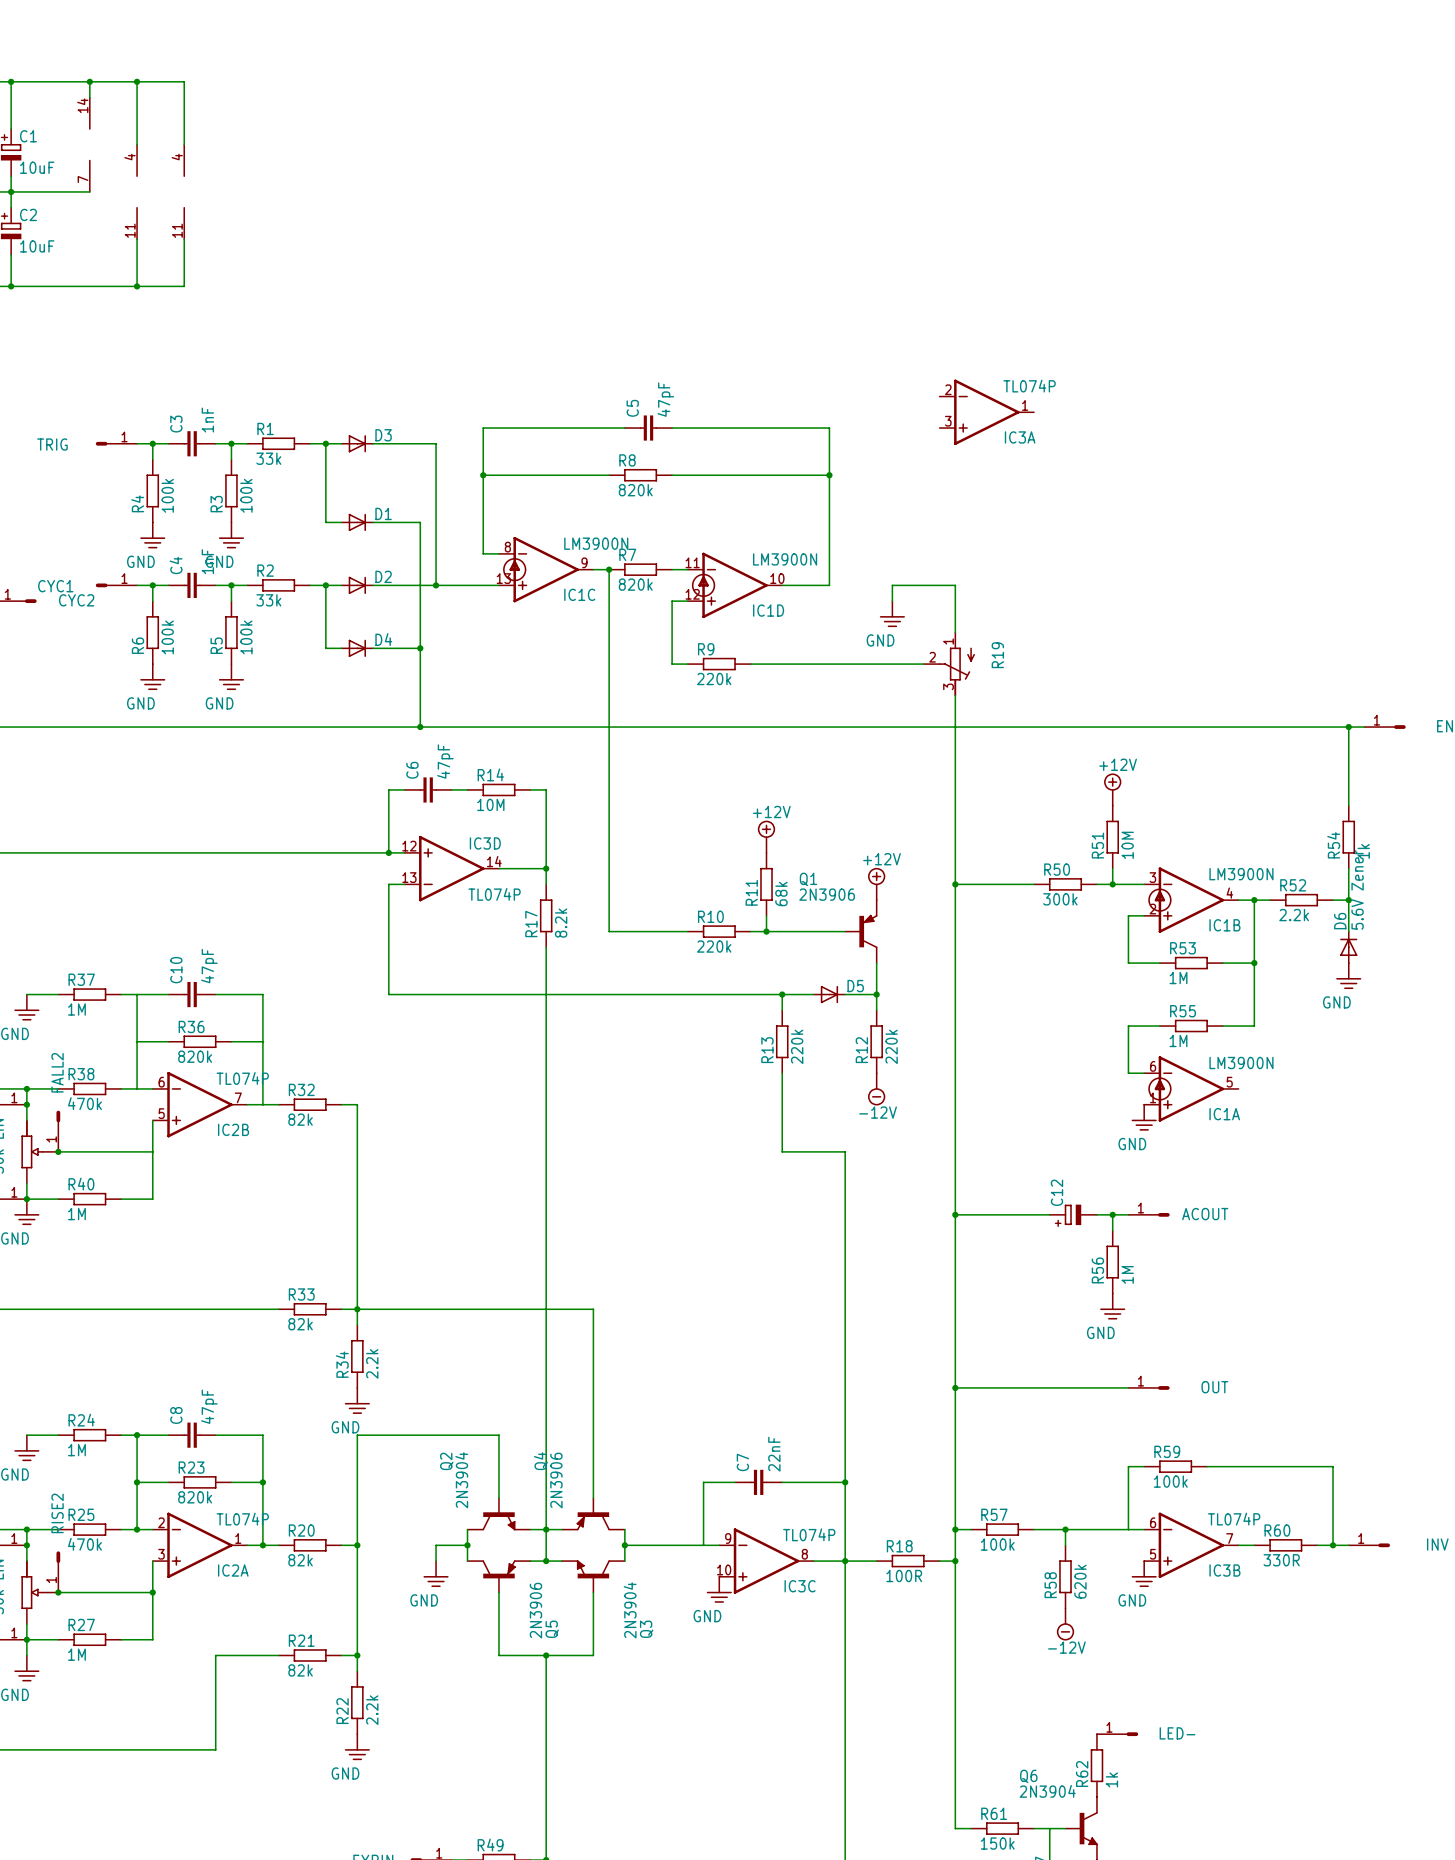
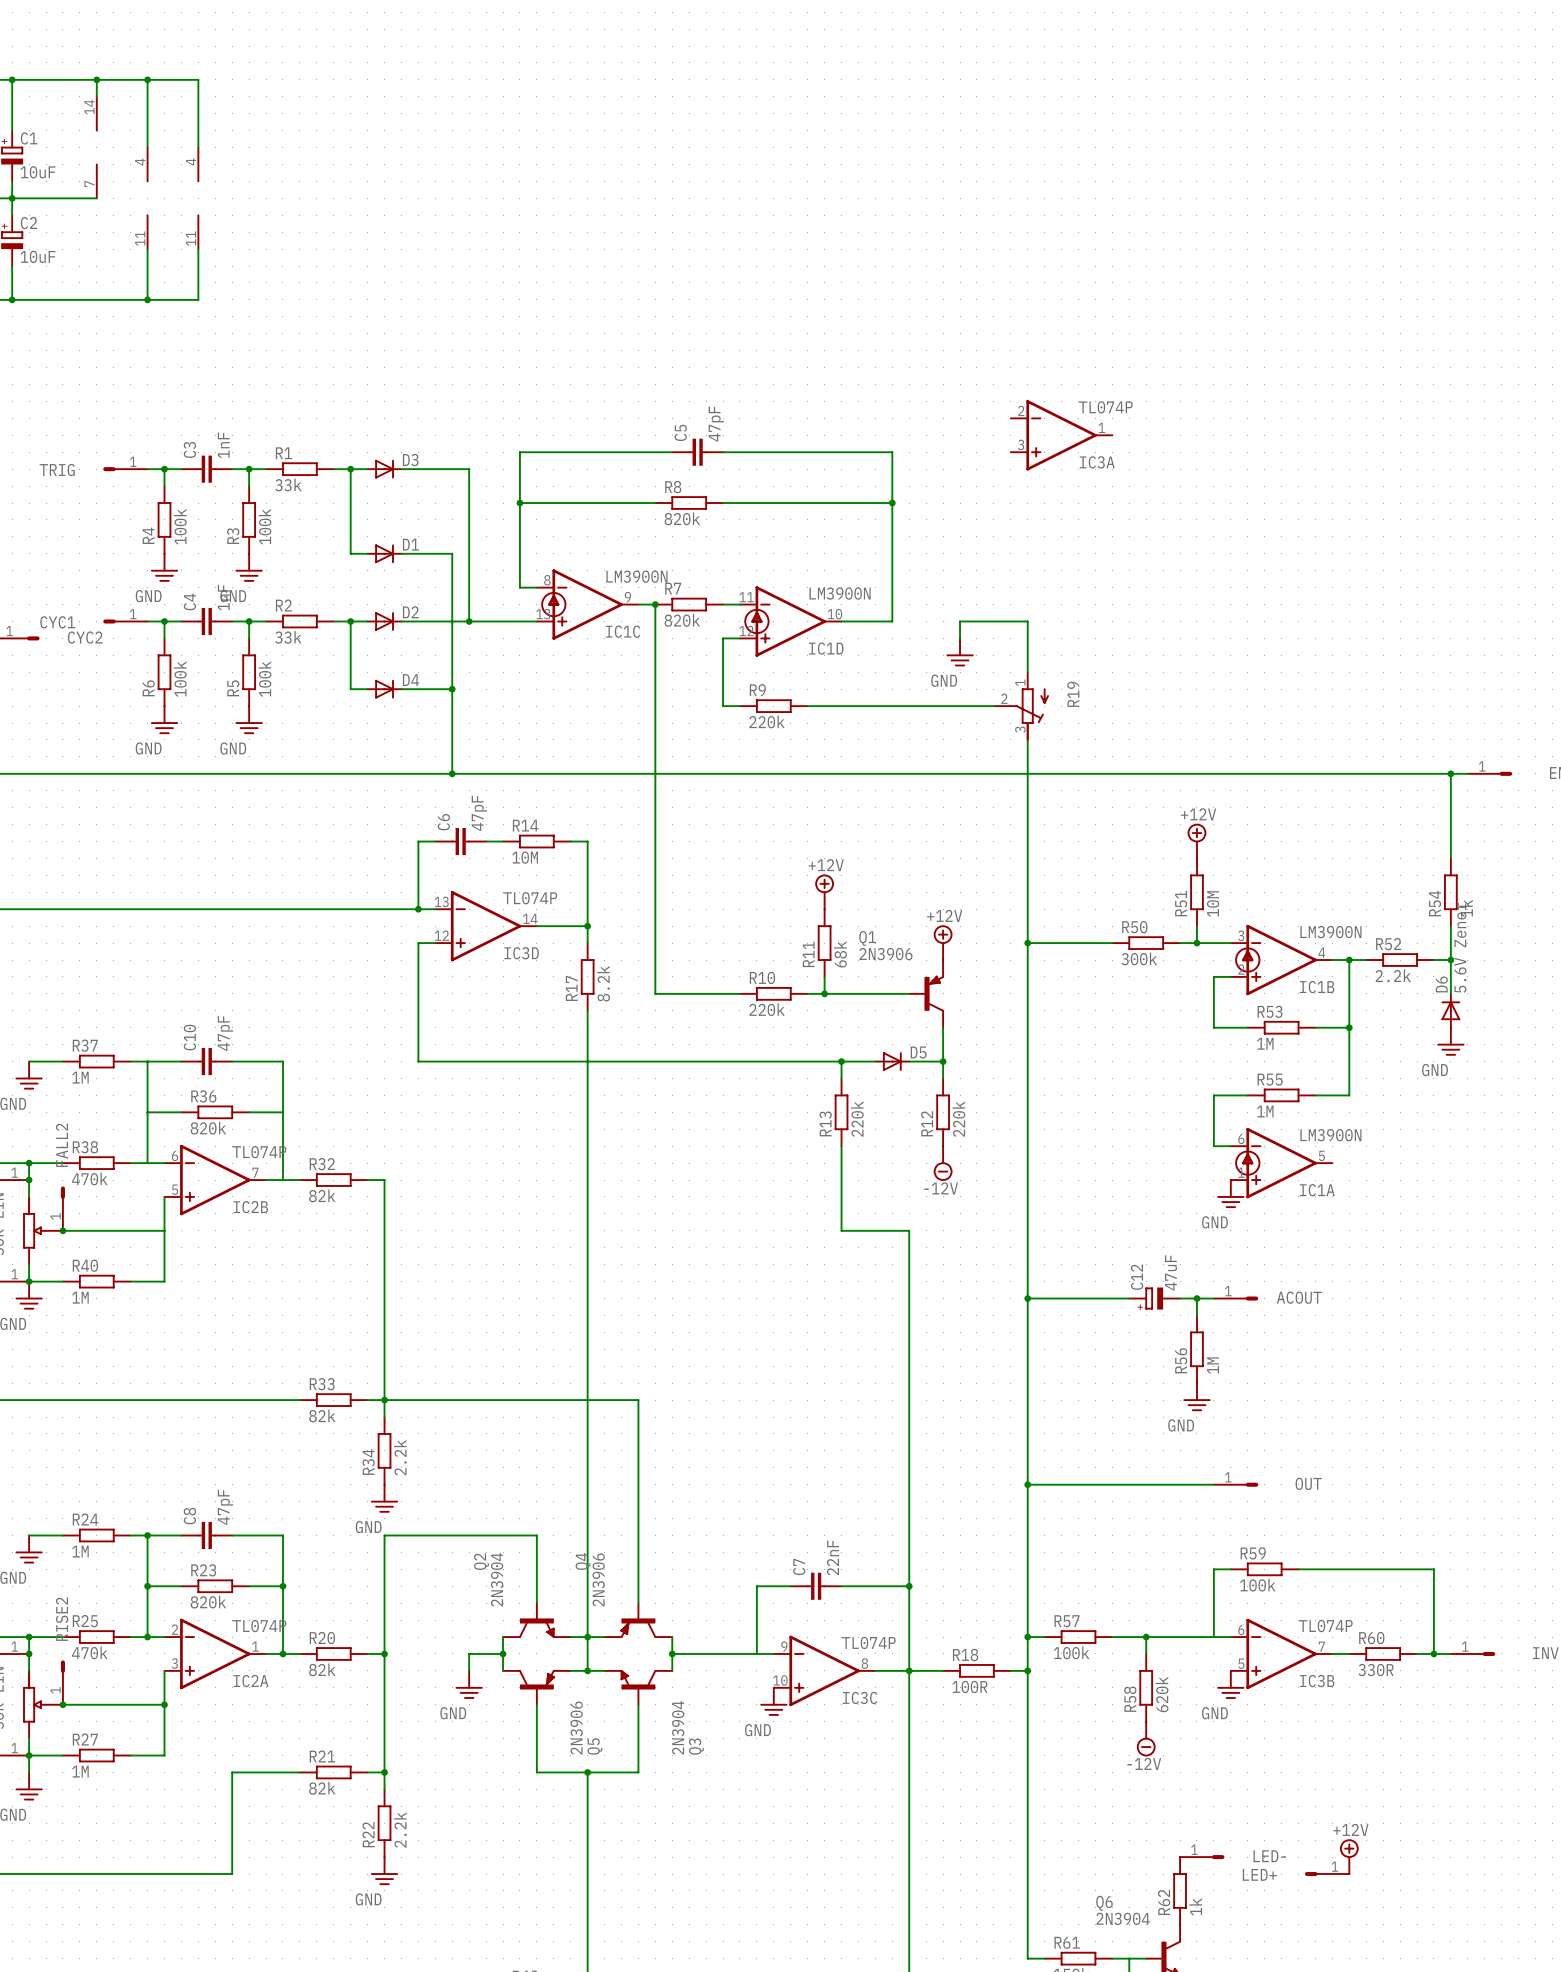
IC3D flip: as is (451, 868) -> up-down (486, 926)
C12 value: none -> 47uF (1171, 1272)
power symbol: none -> +12V (1349, 1856)
LED+: none -> (1327, 1874)

